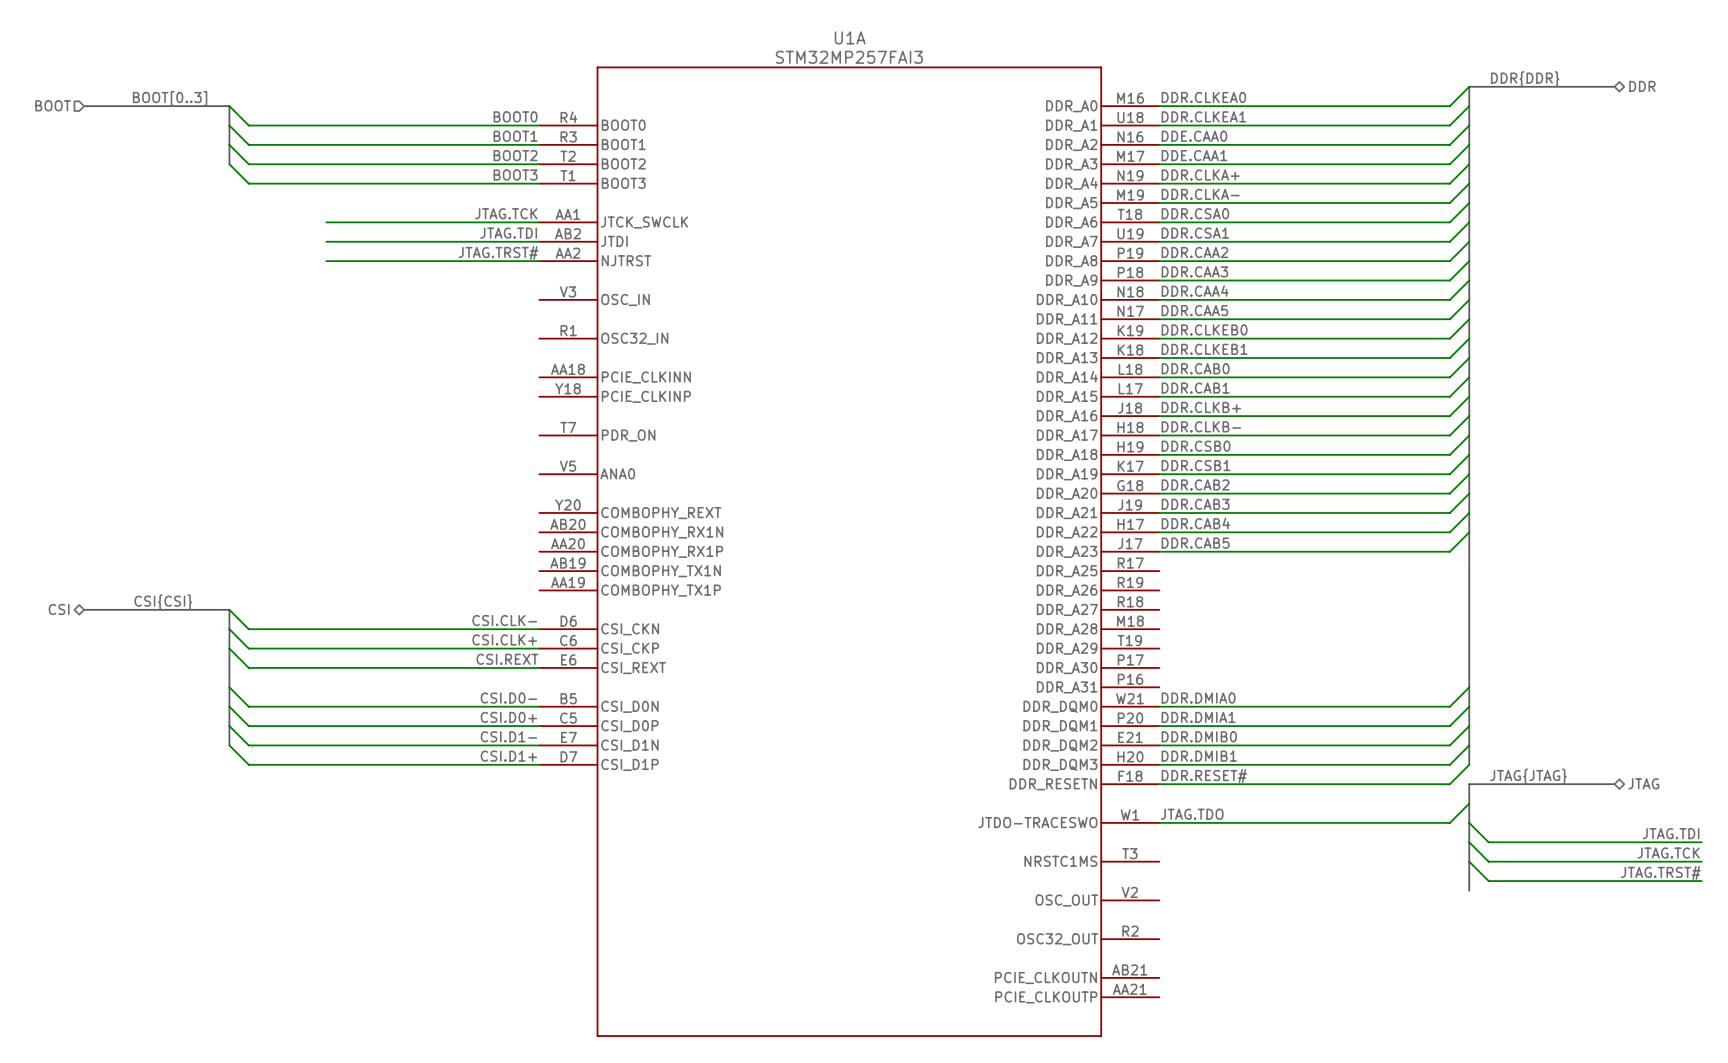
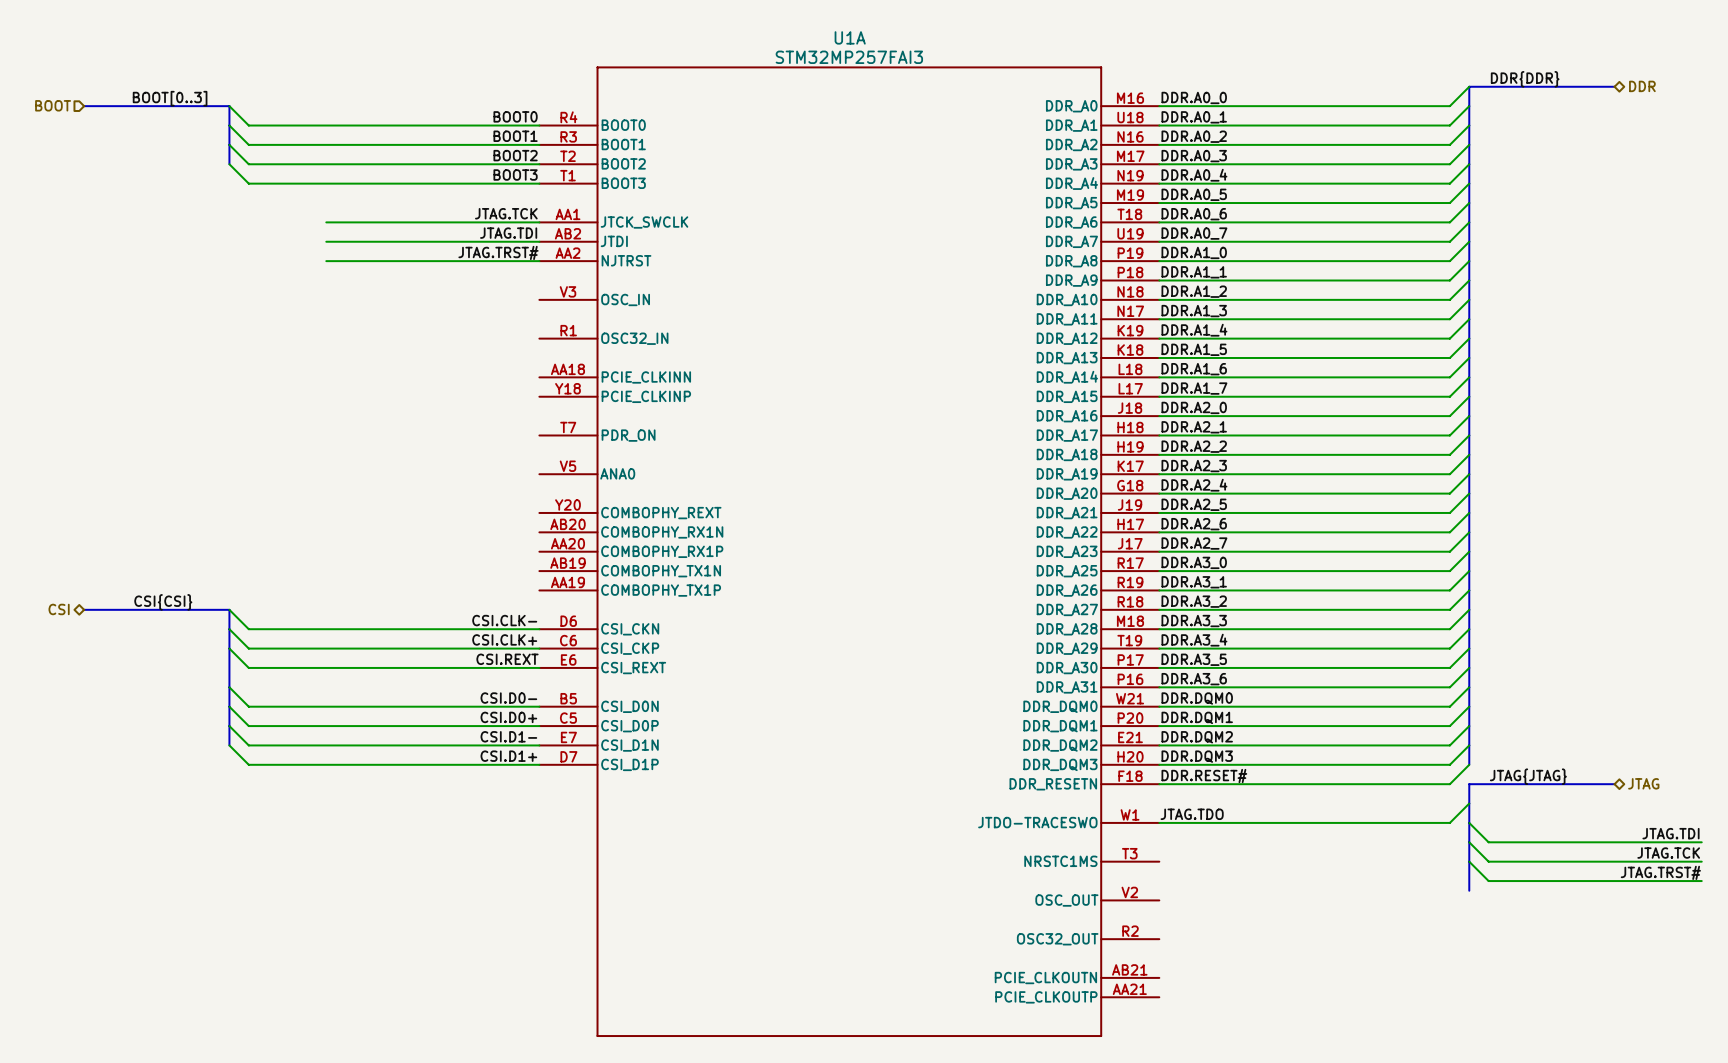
label: DDR.CLKEA0 (1203, 97) -> DDR.A0_0 (1194, 97)
label: DDR.CLKEA1 (1203, 116) -> DDR.A0_1 (1194, 117)
label: DDE.CAA0 (1194, 136) -> DDR.A0_2 (1194, 136)
label: DDE.CAA1 (1194, 155) -> DDR.A0_3 (1194, 156)
label: DDR.CLKA+ (1200, 174) -> DDR.A0_4 (1194, 175)
label: DDR.CLKA- (1200, 194) -> DDR.A0_5 (1194, 194)
label: DDR.CSA0 (1195, 213) -> DDR.A0_6 (1194, 214)
label: DDR.CSA1 (1195, 233) -> DDR.A0_7 (1194, 233)
label: DDR.CAA2 (1194, 252) -> DDR.A1_0 (1194, 252)
label: DDR.CAA3 (1194, 271) -> DDR.A1_1 (1194, 272)
label: DDR.CAA4 (1195, 291) -> DDR.A1_2 (1194, 291)
label: DDR.CAA5 (1194, 310) -> DDR.A1_3 (1194, 311)
label: DDR.CLKEB0 (1204, 329) -> DDR.A1_4 (1194, 330)
label: DDR.CLKEB1 (1204, 349) -> DDR.A1_5 (1194, 349)
label: DDR.CAB0 (1195, 368) -> DDR.A1_6 (1194, 369)
label: DDR.CAB1 (1195, 388) -> DDR.A1_7 (1194, 388)
label: DDR.CLKB+ (1201, 407) -> DDR.A2_0 (1194, 407)
label: DDR.CLKB- (1201, 426) -> DDR.A2_1 (1194, 427)
label: DDR.CSB0 (1196, 446) -> DDR.A2_2 (1194, 446)
label: DDR.CSB1 (1196, 465) -> DDR.A2_3 (1194, 466)
label: DDR.CAB2 (1195, 484) -> DDR.A2_4 (1194, 485)
label: DDR.CAB3 (1195, 504) -> DDR.A2_5 (1194, 504)
label: DDR.CAB4 (1195, 523) -> DDR.A2_6 (1194, 524)
label: DDR.CAB5 (1195, 543) -> DDR.A2_7 (1194, 543)
wire: none -> (1469, 551) (1449, 571) (1159, 571)
label: none -> DDR.A3_0 (1194, 562)
wire: none -> (1469, 571) (1449, 590) (1159, 590)
label: none -> DDR.A3_1 (1194, 582)
wire: none -> (1469, 590) (1449, 609) (1159, 609)
label: none -> DDR.A3_2 (1194, 601)
wire: none -> (1469, 609) (1449, 629) (1159, 629)
label: none -> DDR.A3_3 (1194, 621)
wire: none -> (1469, 629) (1449, 648) (1159, 648)
label: none -> DDR.A3_4 (1194, 640)
wire: none -> (1469, 648) (1449, 667) (1159, 667)
label: none -> DDR.A3_5 (1194, 659)
wire: none -> (1469, 667) (1449, 687) (1159, 687)
label: none -> DDR.A3_6 (1194, 679)
label: DDR.DMIA0 (1198, 698) -> DDR.DQM0 (1197, 698)
label: DDR.DMIA1 (1198, 717) -> DDR.DQM1 (1197, 717)
label: DDR.DMIB0 (1199, 736) -> DDR.DQM2 (1197, 737)
label: DDR.DMIB1 (1199, 756) -> DDR.DQM3 (1197, 756)

